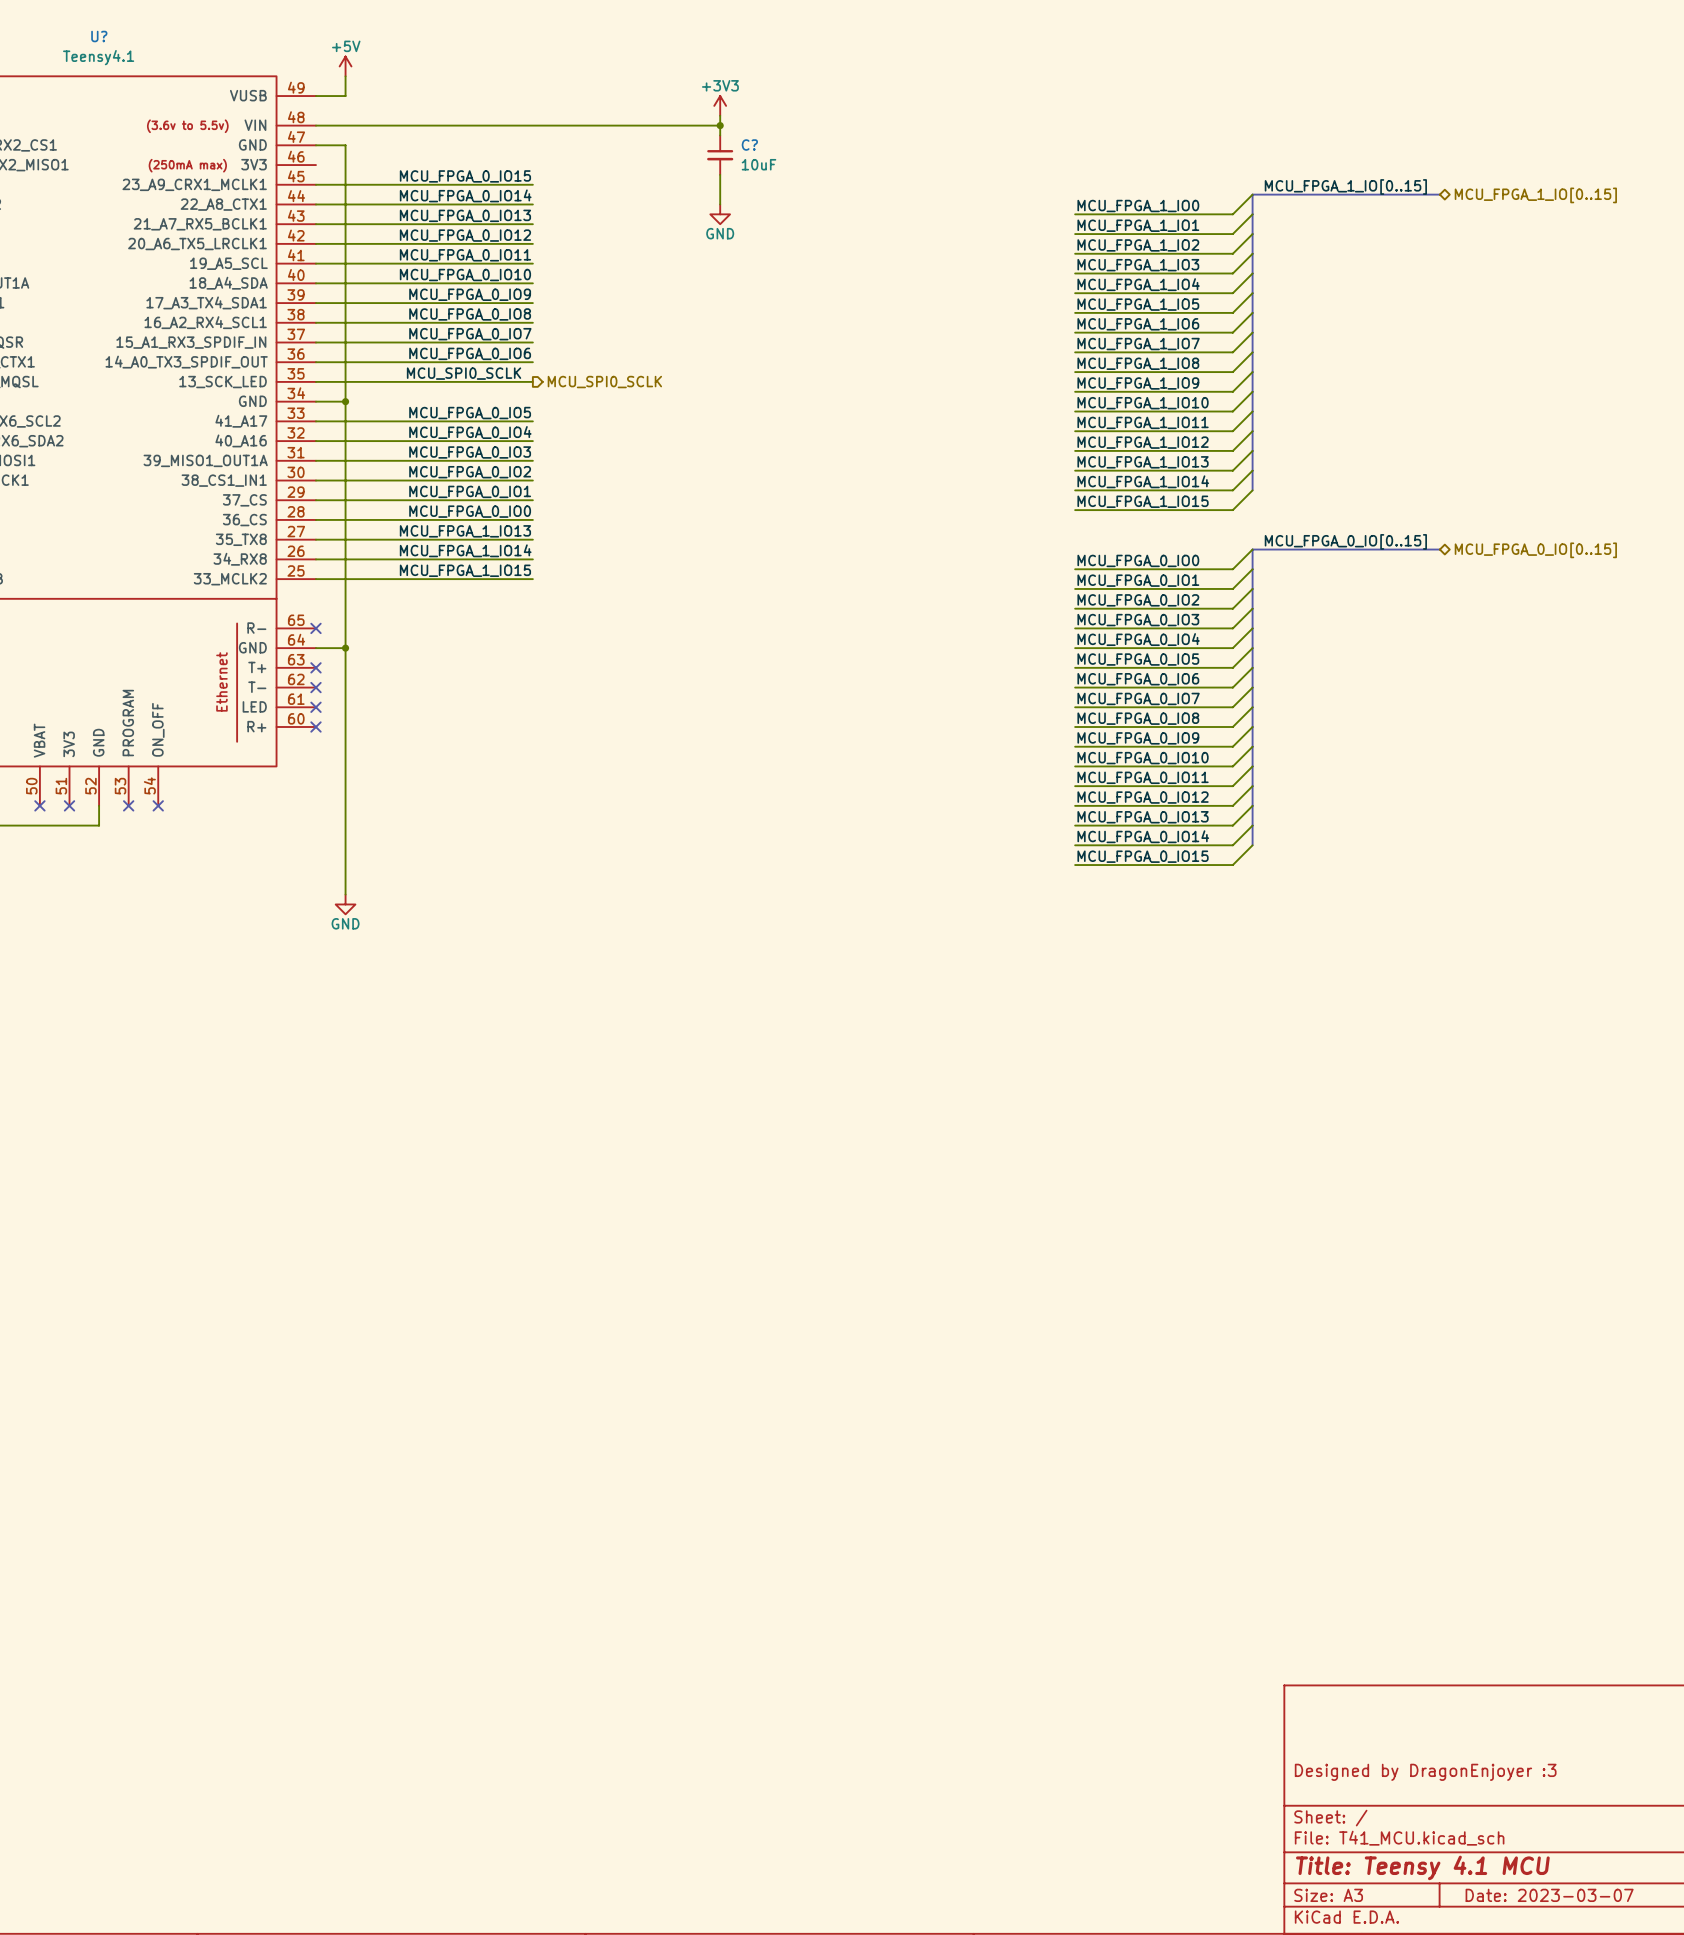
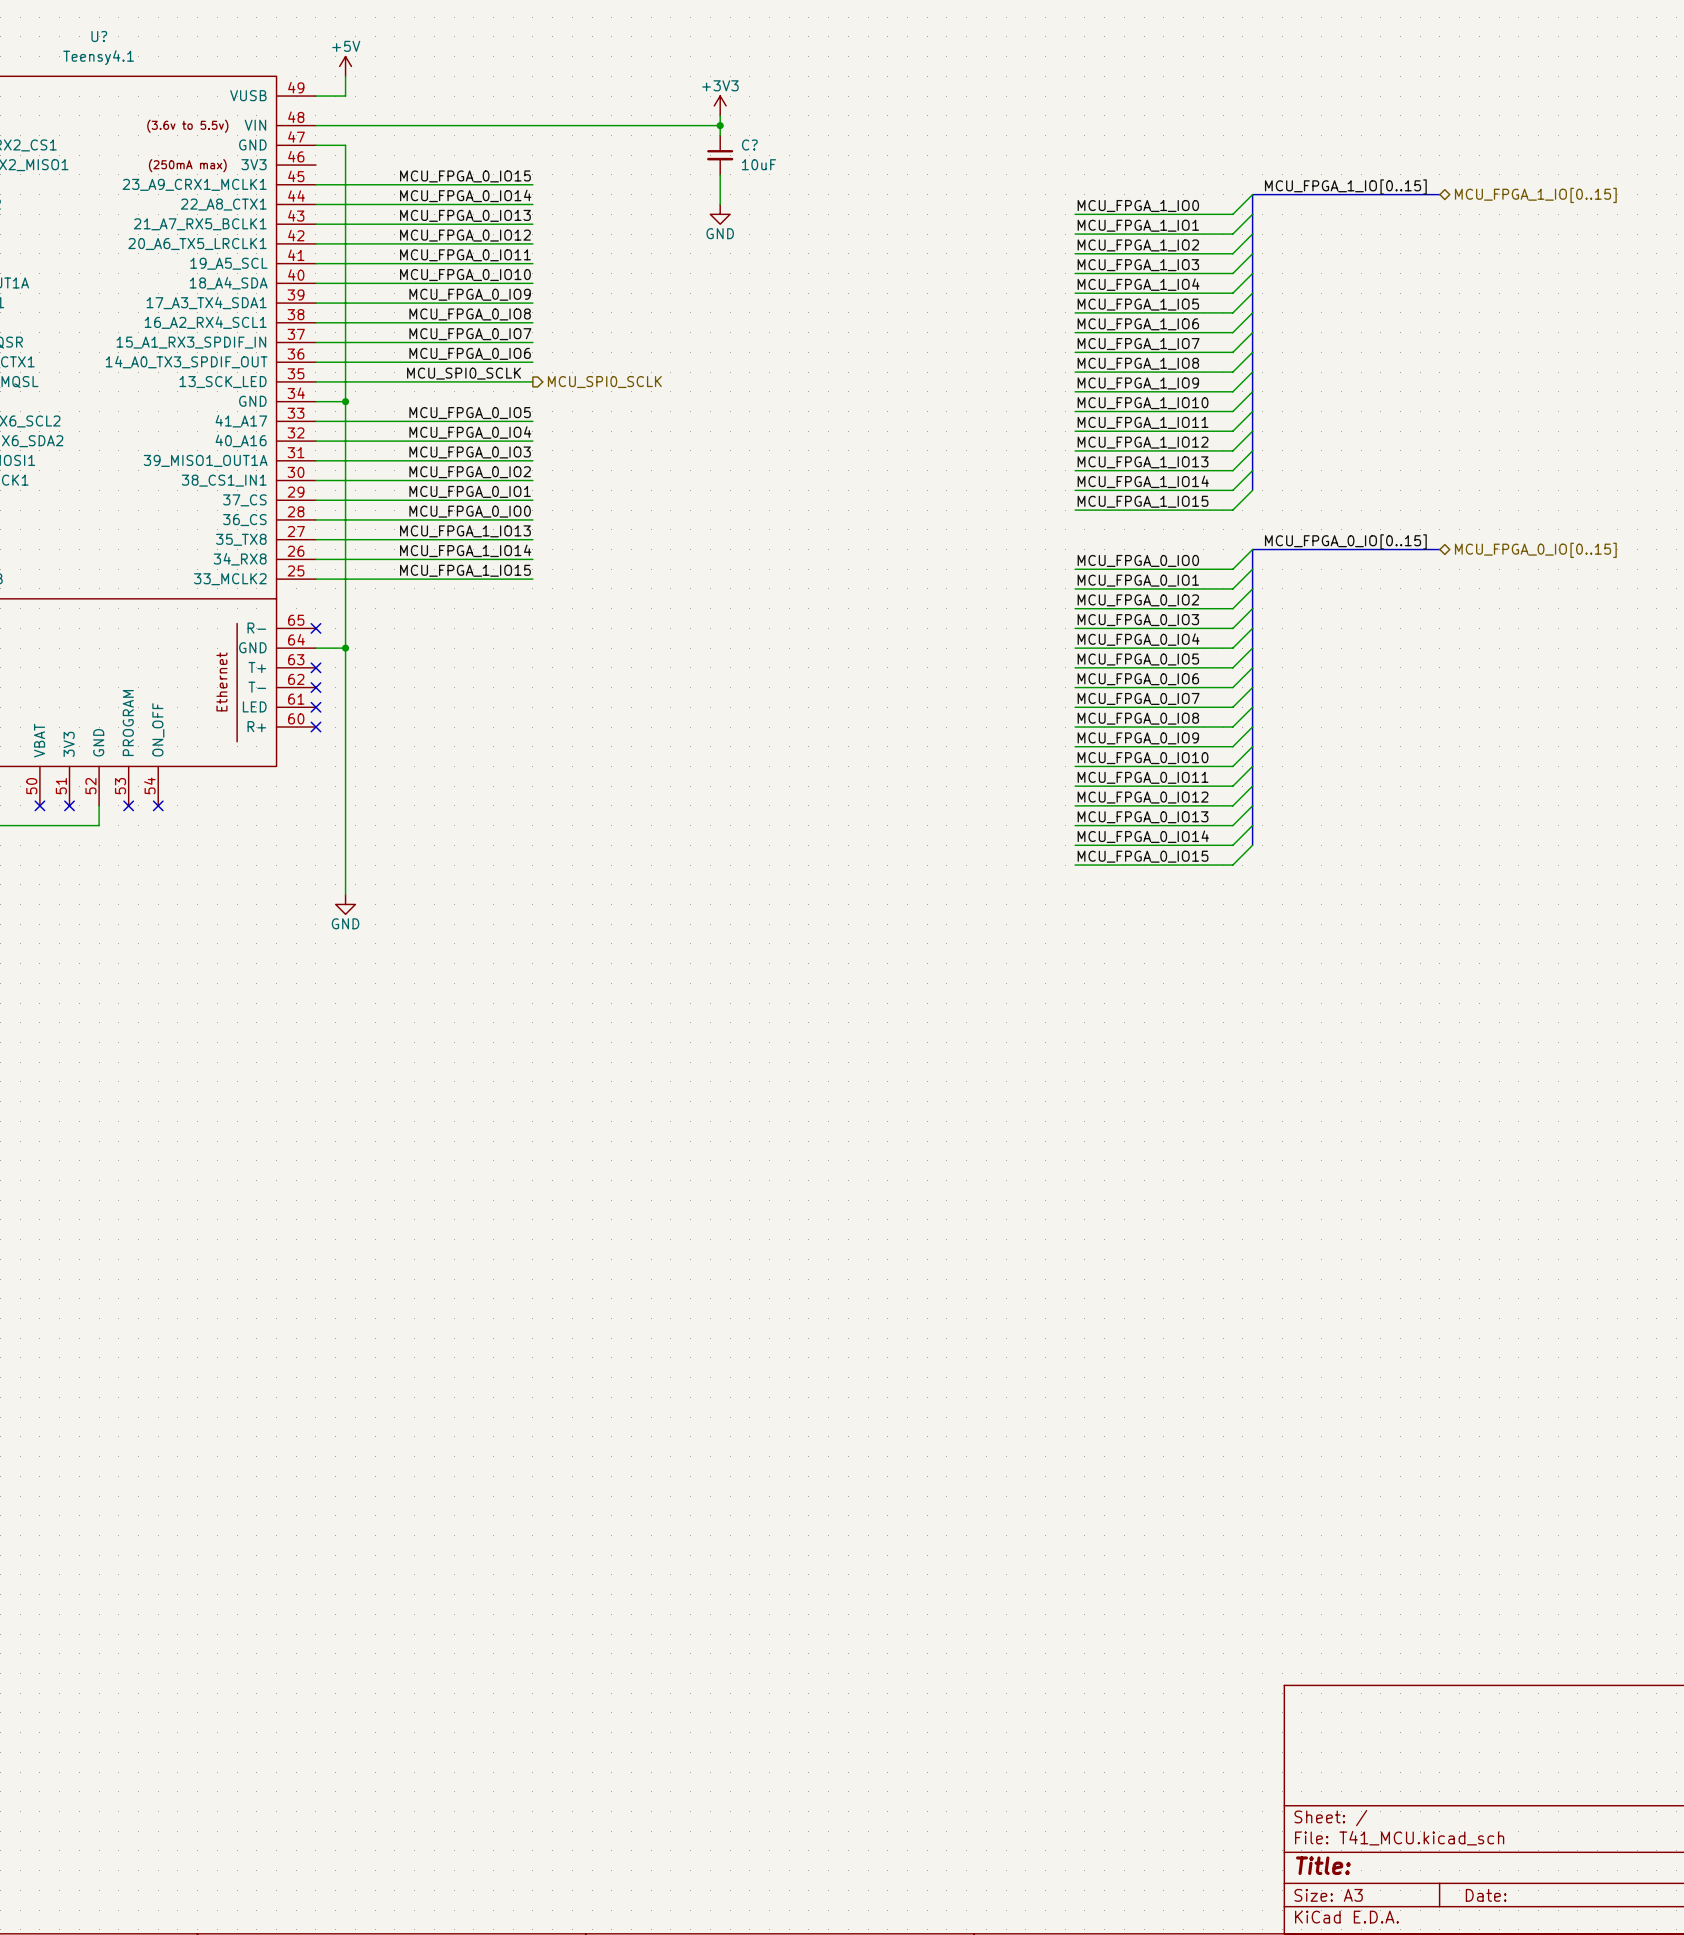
title block: Designed by DragonEnjoyer :3 (1425, 1772) -> none
title block: Title: Teensy 4.1 MCU (1422, 1867) -> Title: (1323, 1865)
title block: Date: 2023-03-07 (1549, 1895) -> Date: (1486, 1895)

